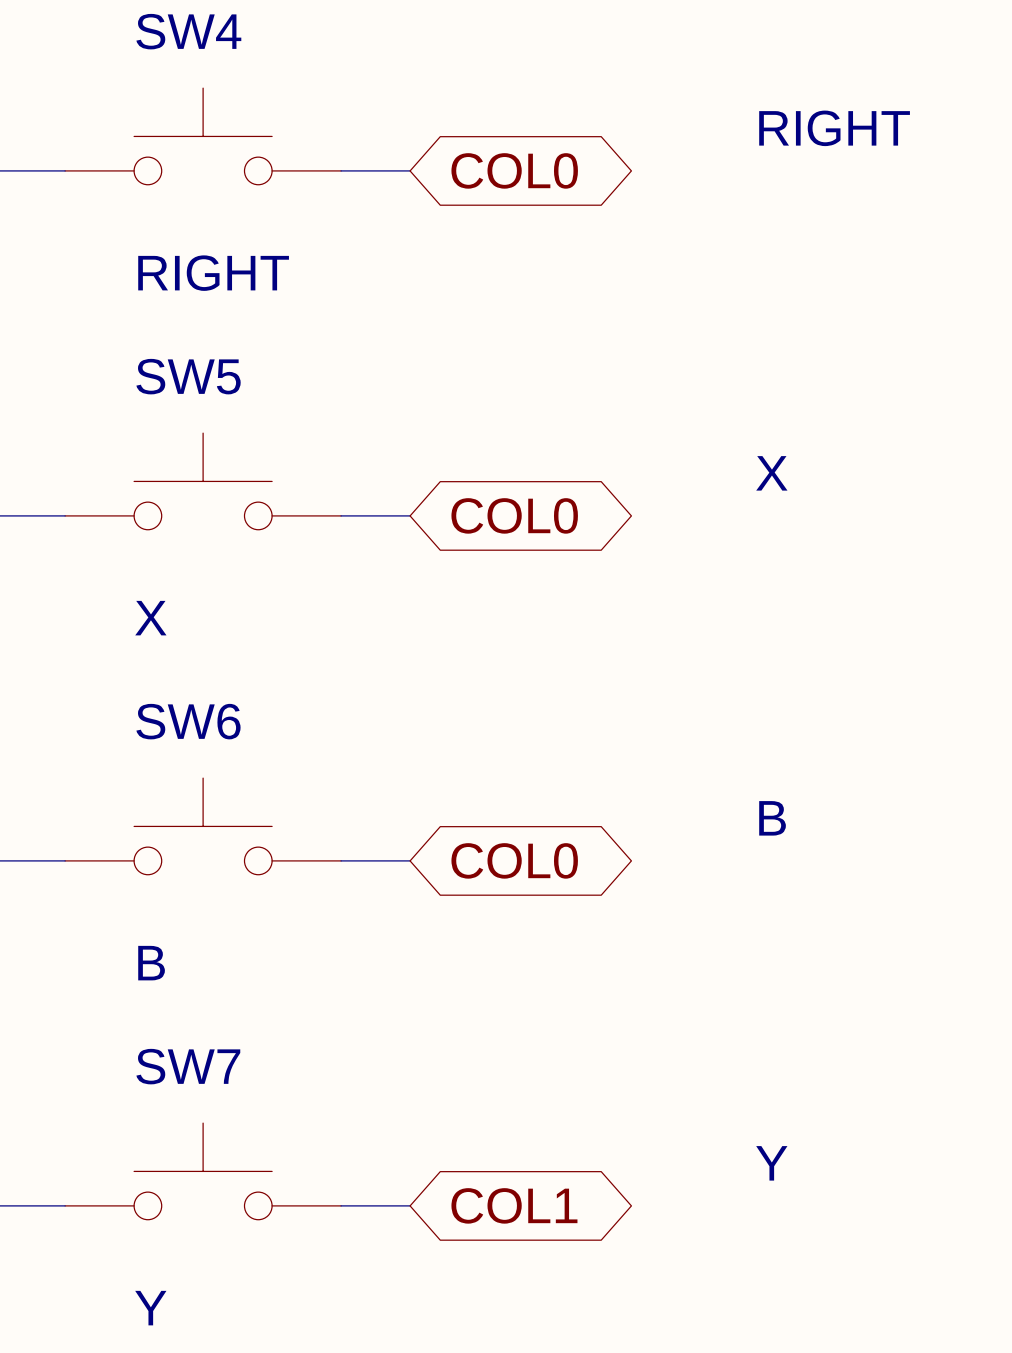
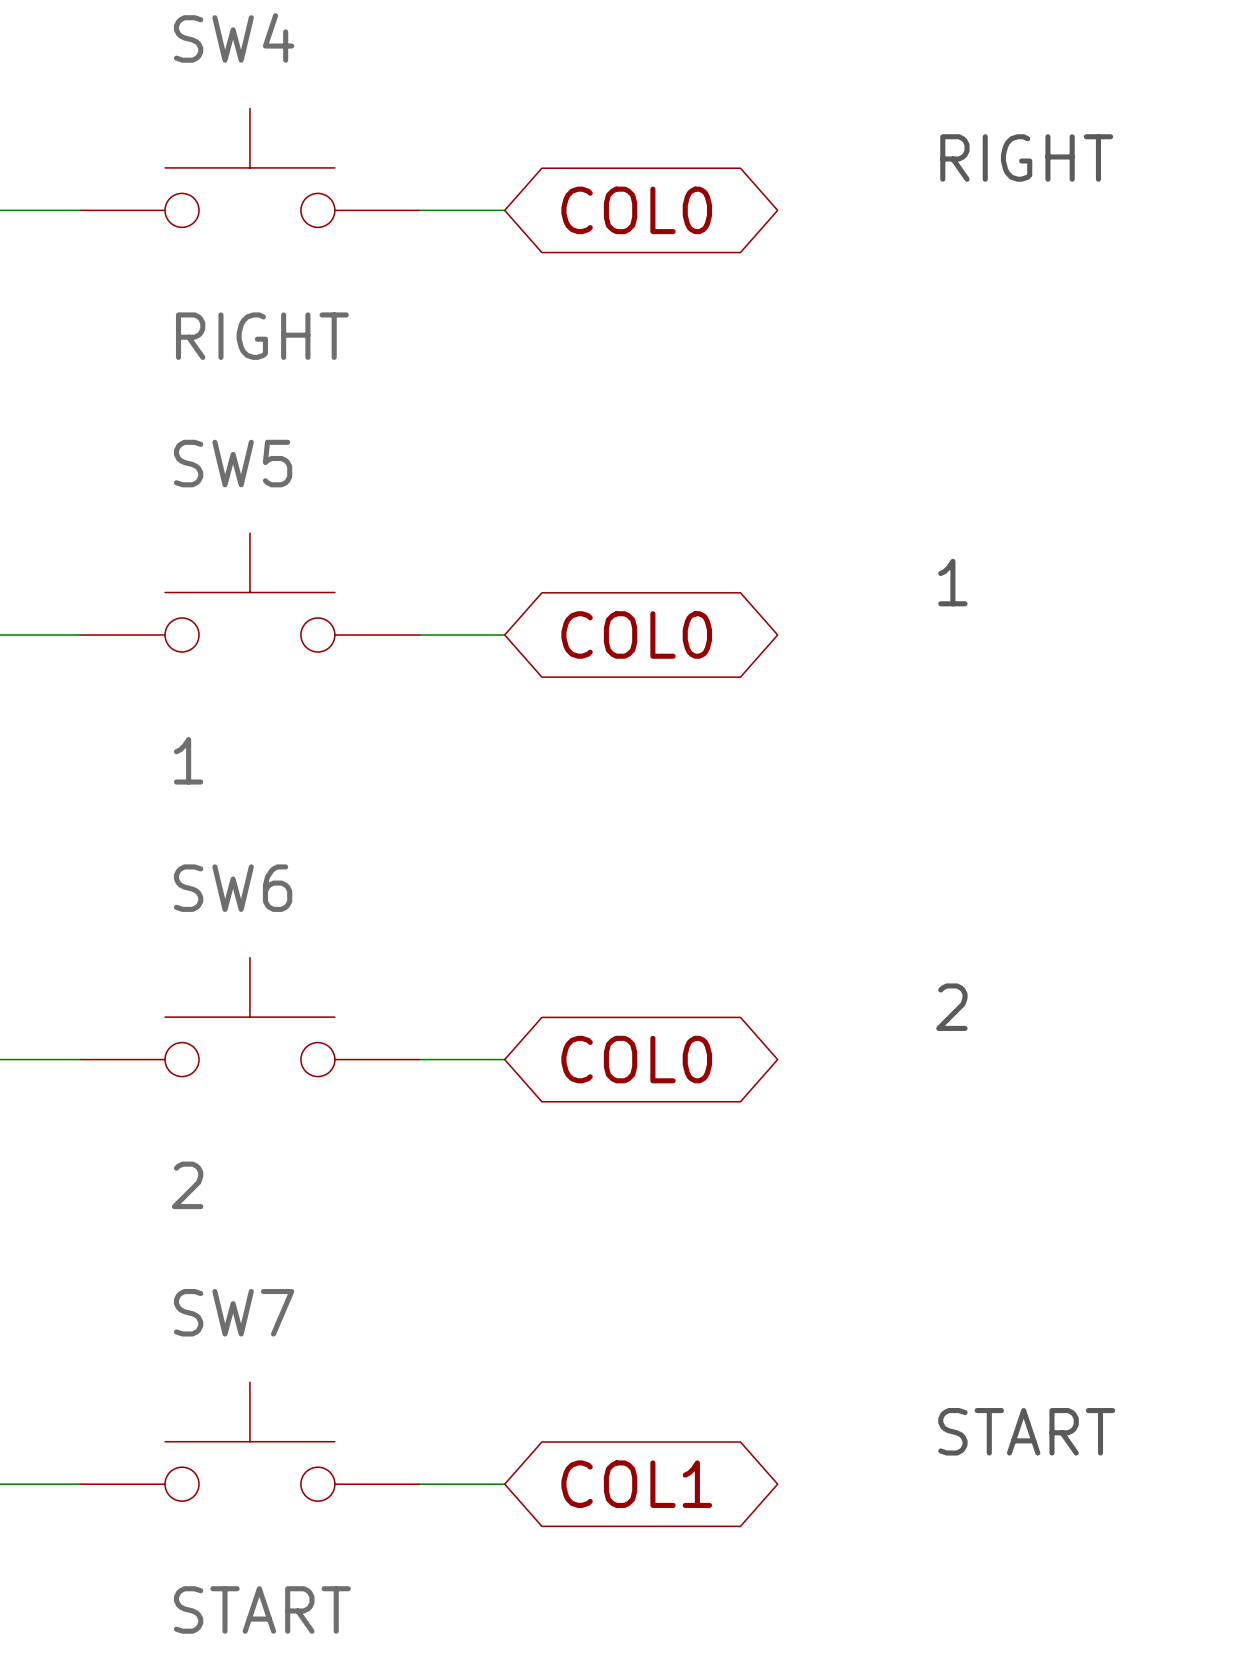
text: X (771, 473) -> 1 (952, 582)
SW5 value: X (150, 618) -> 1 (188, 760)
text: B (772, 818) -> 2 (951, 1007)
SW6 value: B (151, 963) -> 2 (187, 1185)
text: Y (771, 1163) -> START (1026, 1431)
SW7 value: Y (150, 1308) -> START (262, 1609)

